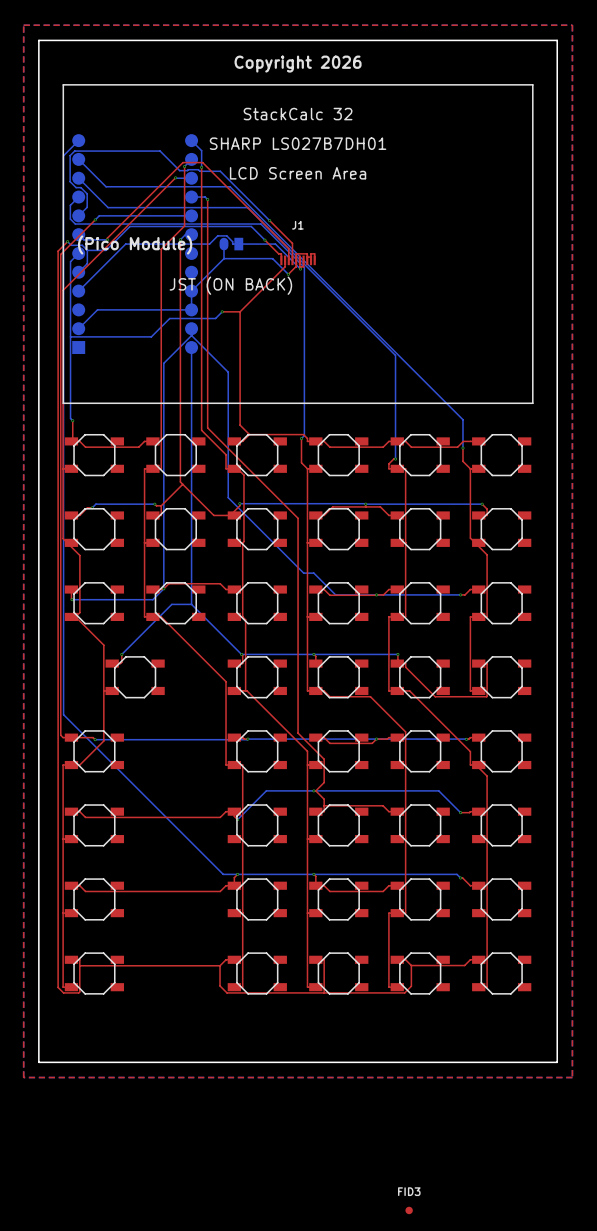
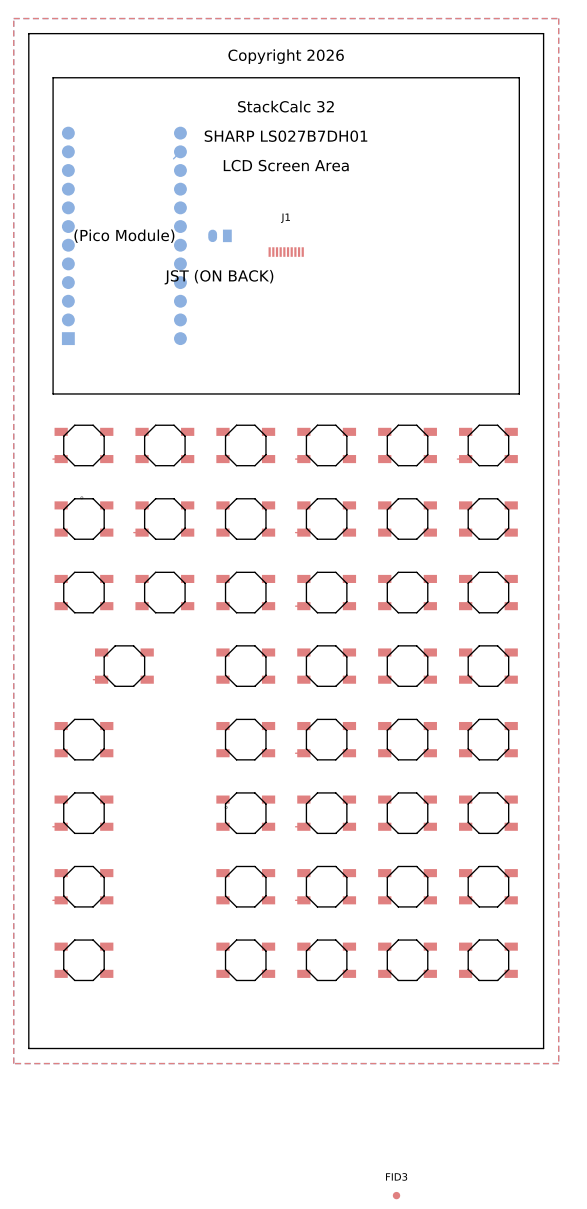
bottom track: (78, 140) (63, 155) (63, 714) (223, 874) (456, 874) (460, 878) -> none
bottom track: (191, 140) (201, 150) (201, 167) -> none
bottom track: (78, 159) (106, 186) (230, 186) (462, 419) (462, 448) -> none
top track: (184, 166) (184, 225) (161, 249) (161, 468) (144, 468) (144, 616) (161, 616) (226, 681) (226, 765) (242, 765) (242, 987) (234, 987) -> none
via: (184, 166) -> none
top track: (201, 167) (201, 430) (226, 454) (226, 468) (237, 468) (243, 475) (242, 542) -> none
via: (201, 167) -> none
top track: (175, 177) (63, 290) (63, 538) (79, 555) (79, 612) (75, 616) -> none
bottom track: (175, 177) (191, 178) -> none
via: (175, 177) -> none
bottom track: (78, 178) (108, 207) (247, 207) (395, 355) (395, 459) -> none
bottom track: (78, 197) (70, 205) (70, 219) (75, 224) (260, 224) (304, 267) (304, 435) (301, 438) -> none
bottom track: (191, 197) (205, 197) (207, 199) -> none
top track: (207, 199) (207, 427) (298, 518) (298, 733) (324, 759) (324, 782) (315, 790) -> none
via: (207, 199) -> none
bottom track: (78, 215) (87, 207) (87, 193) (70, 181) (70, 155) (74, 151) (160, 151) (179, 170) (220, 171) (269, 220) -> none
bottom track: (191, 215) (99, 215) (95, 219) -> none
top track: (95, 219) (60, 254) (60, 735) (63, 737) (93, 737) (95, 739) -> none
via: (95, 219) -> none
top track: (269, 220) (292, 243) (292, 260) -> none
via: (269, 220) -> none
bottom track: (78, 234) (83, 239) (107, 239) -> none
bottom track: (191, 234) (185, 234) (180, 239) -> none
top track: (107, 239) (182, 162) (202, 162) (288, 248) (288, 260) -> none
via: (107, 239) -> none
top track: (180, 239) (180, 481) (182, 484) -> none
via: (180, 239) -> none
top track: (264, 240) (278, 253) (281, 253) (281, 260) -> none
bottom track: (264, 240) (251, 226) (129, 226) (106, 250) (87, 250) -> none
via: (264, 240) -> none
top track: (67, 241) (58, 251) (58, 987) (63, 992) (79, 991) (79, 959) (71, 959) -> none
bottom track: (67, 241) (71, 245) (82, 245) (87, 250) -> none
via: (67, 241) -> none
bottom track: (223, 244) (223, 258) -> none
bottom track: (87, 250) (87, 263) (78, 272) -> none
bottom track: (78, 253) (70, 261) (70, 418) (72, 420) -> none
top track: (307, 257) (311, 257) -> none
bottom track: (223, 258) (272, 258) (288, 274) -> none
bottom track: (223, 258) (191, 291) (191, 309) (97, 309) (78, 328) -> none
top track: (285, 260) (285, 266) (240, 311) -> none
top track: (299, 260) (299, 266) (303, 266) (303, 260) -> none
top track: (307, 260) (307, 253) (296, 253) (296, 266) (288, 274) -> none
top track: (311, 260) (311, 253) (314, 253) (314, 260) -> none
bottom track: (300, 269) (275, 244) (232, 244) (226, 235) (217, 235) (209, 244) (125, 244) (78, 291) -> none
via: (300, 269) -> none
via: (288, 274) -> none
top track: (222, 311) (240, 311) -> none
bottom track: (222, 311) (215, 318) (169, 318) (151, 336) (70, 336) -> none
via: (222, 311) -> none
top track: (240, 311) (240, 425) (249, 434) -> none
bottom track: (191, 347) (191, 604) -> none
top track: (72, 420) (72, 441) -> none
via: (72, 420) -> none
top track: (249, 434) (242, 441) (234, 441) -> none
top track: (249, 434) (303, 434) (307, 441) (324, 441) (329, 447) (383, 447) (388, 441) (405, 441) (411, 447) (457, 447) (463, 441) (478, 441) -> none
top track: (301, 438) (301, 462) (307, 468) (307, 690) (324, 690) (329, 696) (370, 696) (405, 731) (405, 913) (388, 913) (388, 987) (397, 987) -> none
via: (301, 438) -> none
top track: (71, 441) (79, 441) (85, 447) (138, 447) (144, 441) (152, 441) -> none
top track: (462, 448) (462, 461) (470, 468) (470, 538) (487, 554) (487, 616) (470, 616) (470, 690) (478, 690) -> none
via: (462, 448) -> none
top track: (395, 459) (388, 463) (388, 468) (405, 468) (405, 616) (388, 616) (388, 690) (409, 690) (470, 751) (470, 765) (478, 765) -> none
via: (395, 459) -> none
top track: (182, 484) (161, 505) -> none
top track: (182, 484) (213, 515) (234, 515) -> none
top track: (239, 503) (230, 515) -> none
bottom track: (239, 503) (482, 504) -> none
via: (239, 503) -> none
top track: (154, 504) (161, 505) -> none
bottom track: (154, 504) (95, 504) (92, 507) -> none
via: (154, 504) -> none
top track: (365, 504) (365, 506) -> none
via: (365, 504) -> none
top track: (482, 504) (487, 509) (487, 515) (478, 515) -> none
via: (482, 504) -> none
top track: (161, 505) (161, 515) (152, 515) -> none
top track: (92, 507) (87, 507) (79, 515) (71, 515) -> none
top track: (315, 515) (324, 515) (332, 506) (380, 506) (388, 515) (397, 515) -> none
top track: (242, 542) (242, 616) -> none
via: (163, 588) -> none
top track: (71, 589) (72, 599) -> none
top track: (152, 589) (163, 588) (168, 583) (220, 583) (226, 589) (234, 589) -> none
top track: (315, 589) (324, 589) (329, 595) (383, 594) (388, 589) (397, 589) -> none
top track: (478, 589) (470, 589) (464, 594) (460, 594) -> none
via: (376, 594) -> none
bottom track: (460, 594) (335, 594) (313, 573) (303, 573) (228, 497) (228, 372) (191, 335) (163, 363) (163, 588) (152, 599) (72, 599) -> none
via: (460, 594) -> none
via: (72, 599) -> none
bottom track: (191, 604) (241, 654) (397, 654) -> none
bottom track: (191, 604) (171, 604) (121, 654) -> none
top track: (75, 616) (103, 645) (103, 740) (79, 765) (63, 765) (63, 987) (71, 987) -> none
top track: (242, 616) (245, 619) (245, 690) -> none
top track: (121, 654) (120, 663) (112, 663) -> none
via: (121, 654) -> none
top track: (241, 654) (242, 663) (234, 663) -> none
via: (241, 654) -> none
top track: (313, 654) (315, 656) (315, 663) -> none
via: (313, 654) -> none
top track: (397, 654) (397, 660) (401, 663) -> none
via: (397, 654) -> none
top track: (397, 663) (405, 663) (405, 667) (435, 696) (486, 696) (487, 663) (478, 663) -> none
top track: (234, 690) (247, 690) (307, 751) (307, 987) (315, 987) -> none
top track: (234, 737) (247, 739) -> none
top track: (315, 737) (324, 737) (329, 743) (372, 743) (376, 739) (397, 737) -> none
top track: (478, 737) (466, 739) -> none
via: (95, 739) -> none
via: (247, 739) -> none
via: (376, 739) -> none
bottom track: (466, 739) (95, 739) -> none
via: (466, 739) -> none
top track: (476, 765) (487, 776) (487, 987) (478, 987) -> none
via: (313, 790) -> none
top track: (315, 790) (324, 799) (324, 811) (315, 811) -> none
top track: (324, 805) (383, 805) (388, 811) (397, 811) -> none
top track: (71, 811) (79, 811) (85, 817) (220, 817) (226, 811) (234, 811) (234, 816) (237, 819) -> none
top track: (478, 811) (460, 812) -> none
bottom track: (460, 812) (438, 790) (266, 790) (237, 819) -> none
via: (460, 812) -> none
top track: (237, 874) (234, 877) (234, 885) (226, 885) (220, 891) (85, 891) (79, 885) (71, 885) -> none
via: (237, 874) -> none
top track: (313, 874) (315, 876) (315, 885) (324, 885) (329, 891) (383, 891) (388, 885) (397, 885) -> none
via: (313, 874) -> none
top track: (460, 878) (470, 885) (478, 885) -> none
via: (460, 878) -> none
top track: (234, 959) (226, 959) (220, 965) -> none
top track: (315, 959) (324, 959) (324, 992) -> none
top track: (397, 959) (405, 959) (411, 965) -> none
top track: (478, 959) (470, 959) (464, 965) (411, 965) -> none
top track: (79, 965) (220, 965) -> none
top track: (411, 965) (411, 986) (404, 992) (227, 992) (220, 985) (220, 965) -> none

